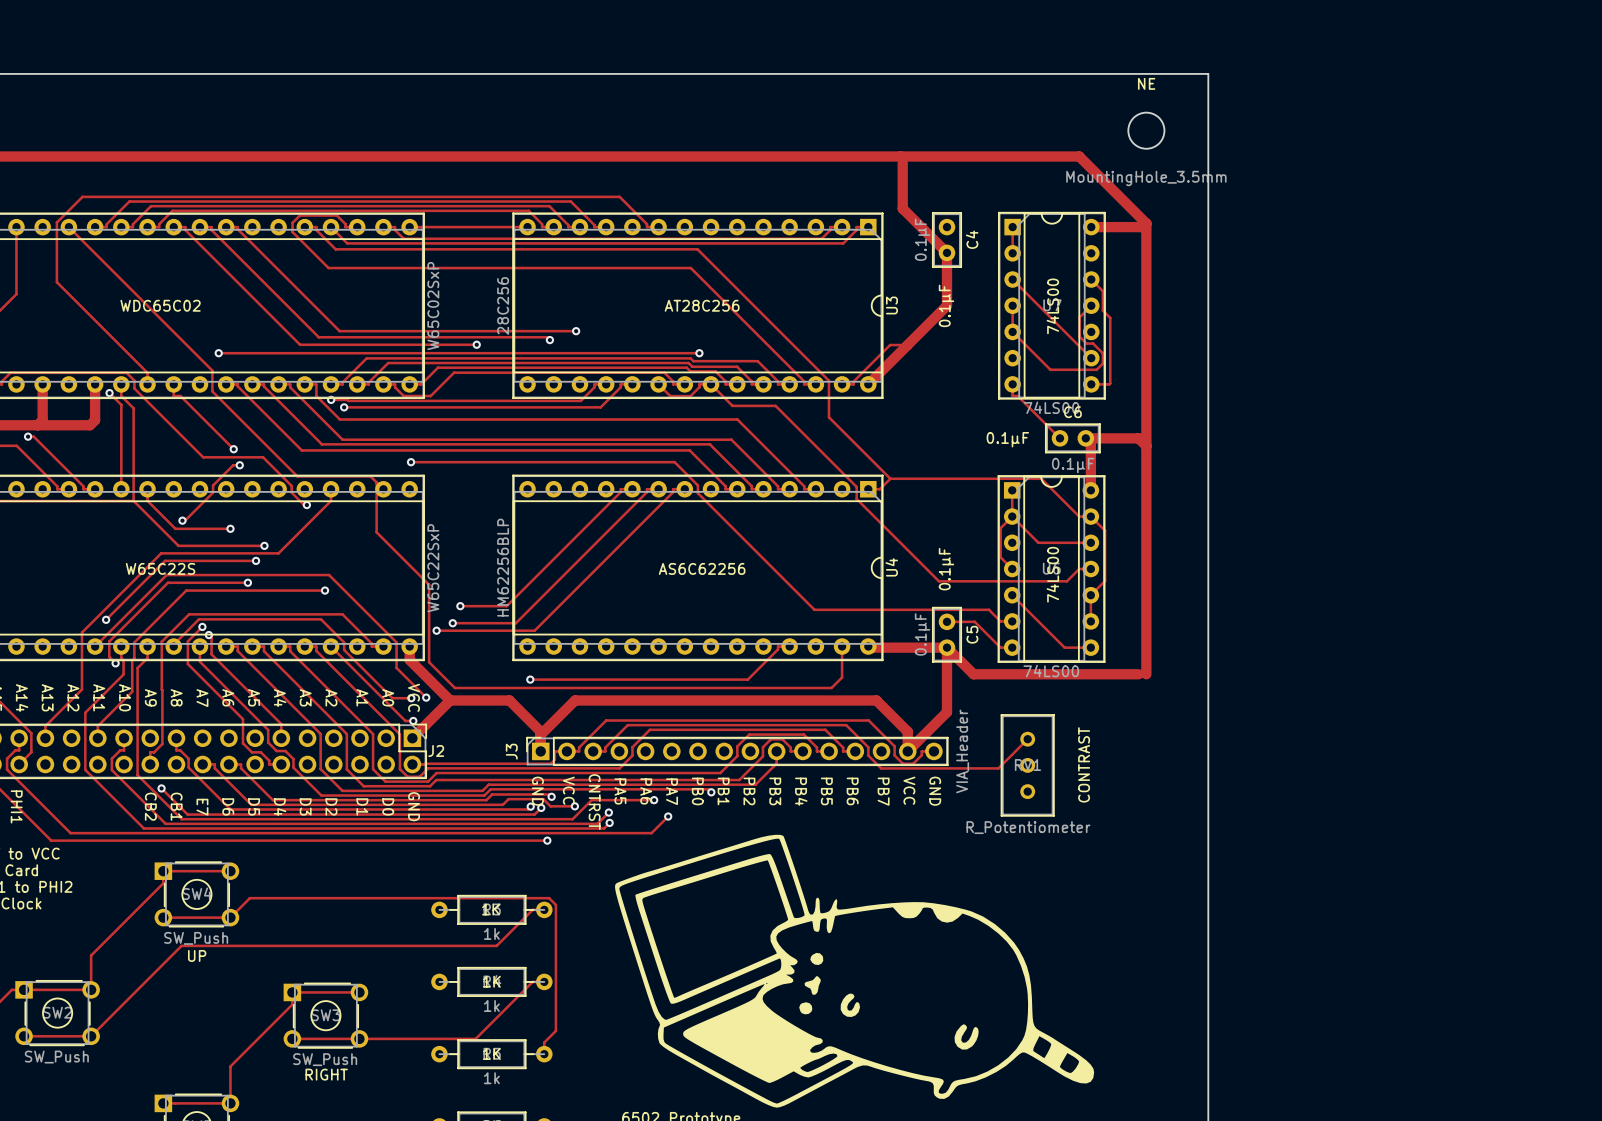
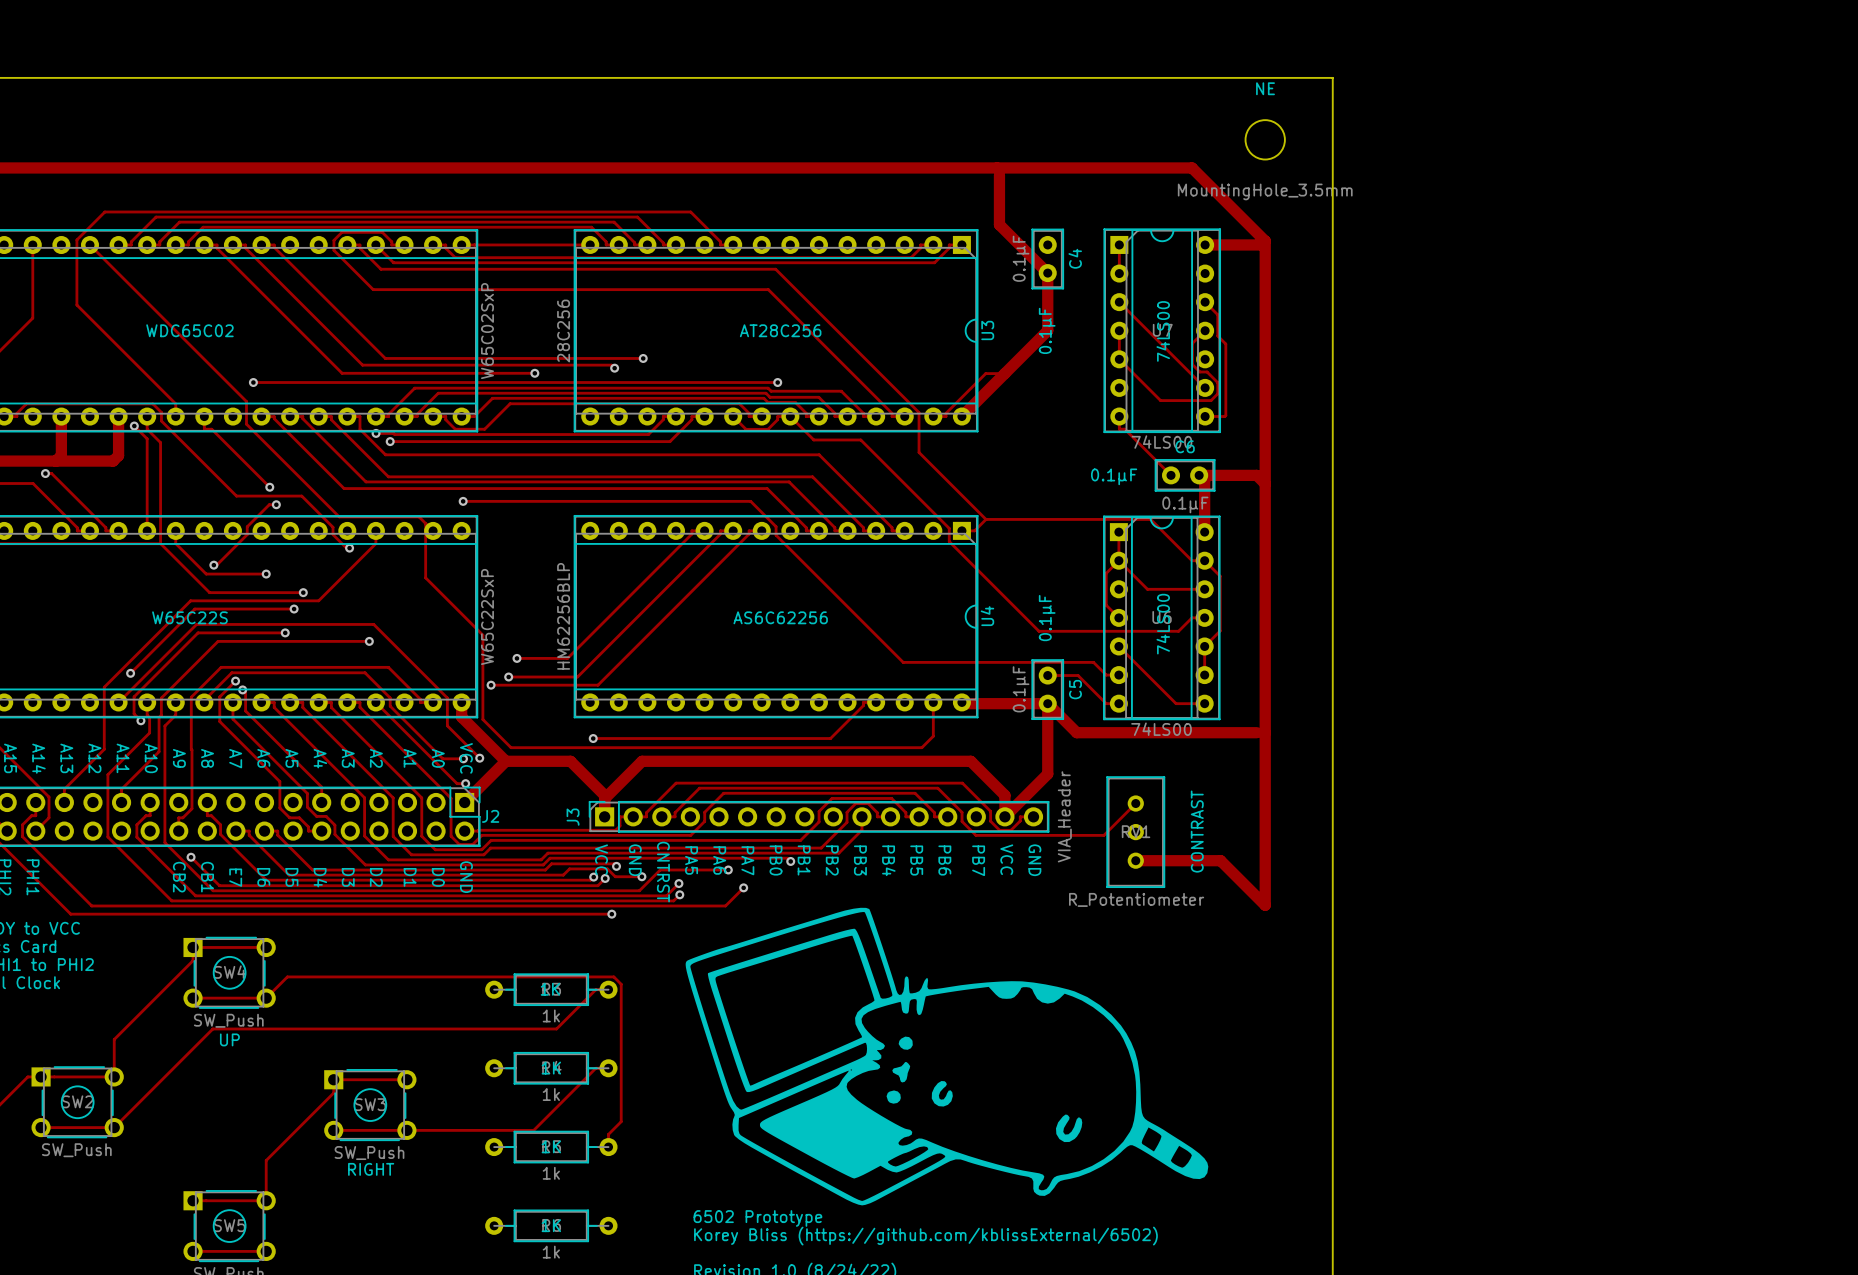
track: none -> (1265, 732) (1265, 905) (1220, 860) (1135, 860)
text: VCC (568, 790) -> GND (635, 860)
text: GND (537, 791) -> VCC (601, 859)

